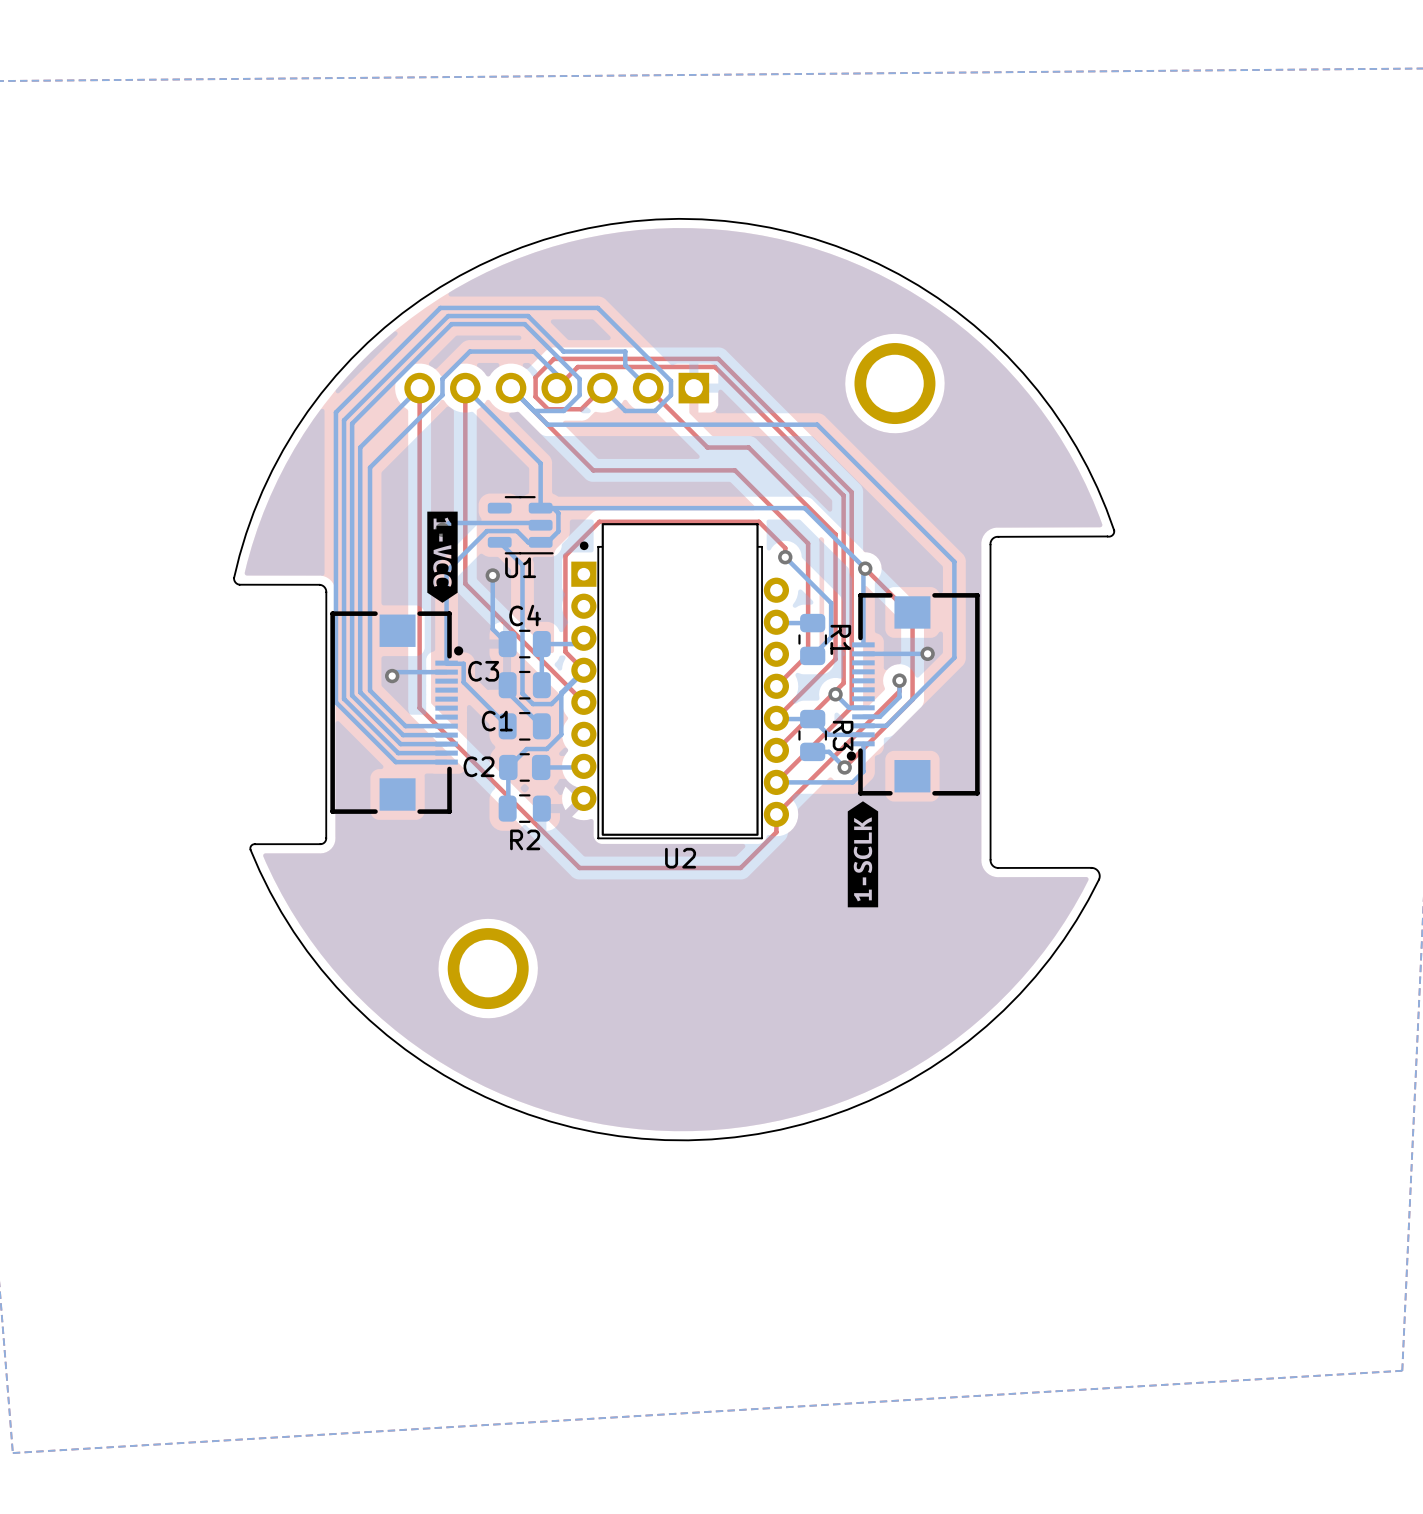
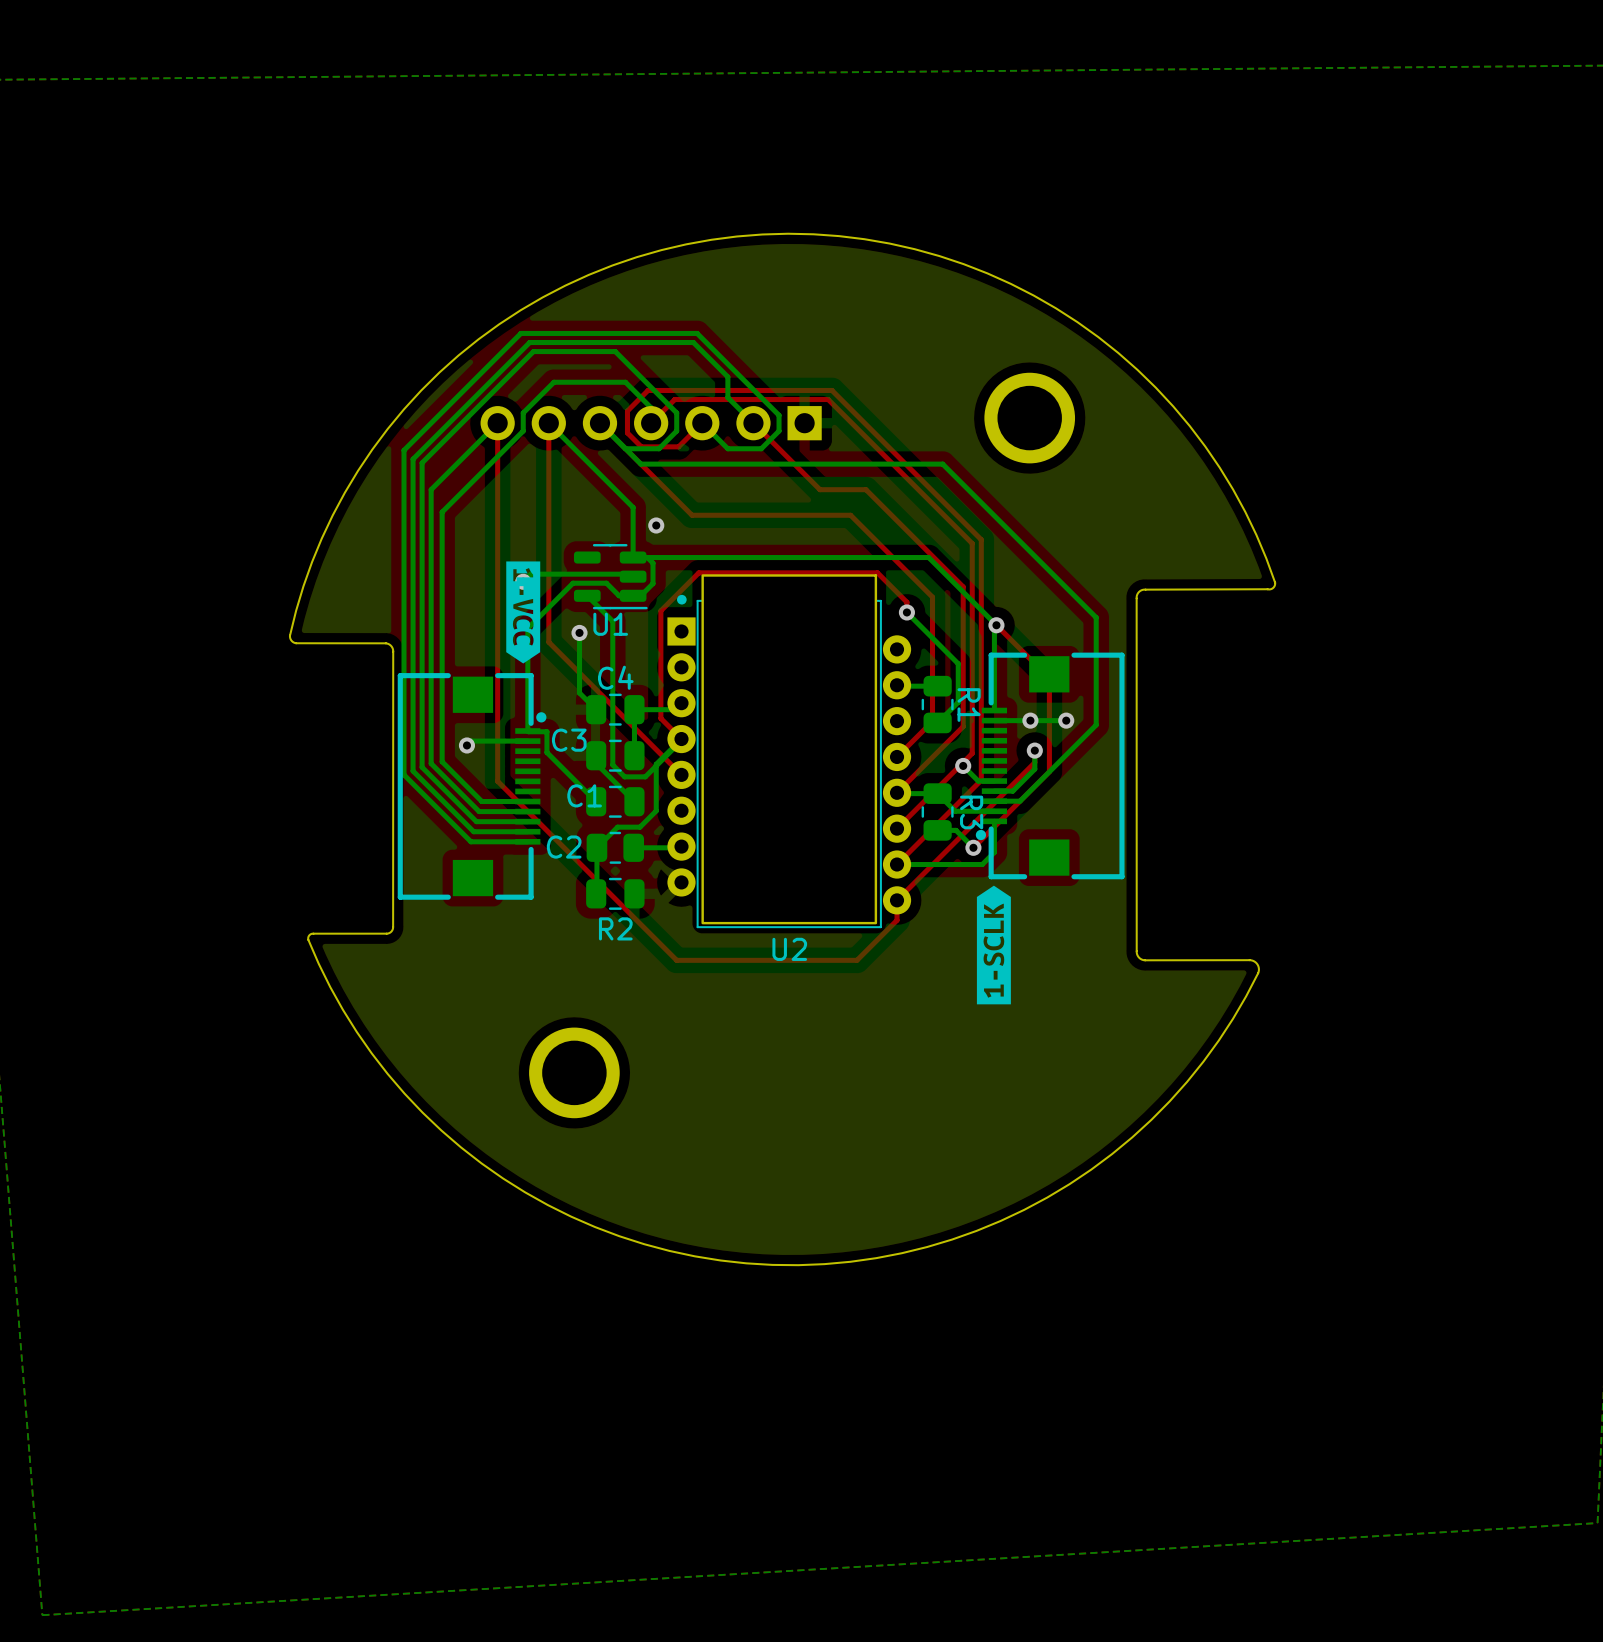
bottom track: (528, 316) (563, 351) (625, 351) -> (619, 342) (693, 342) (727, 376) (727, 382)
via: none -> (656, 525)
via: none -> (1030, 720)

